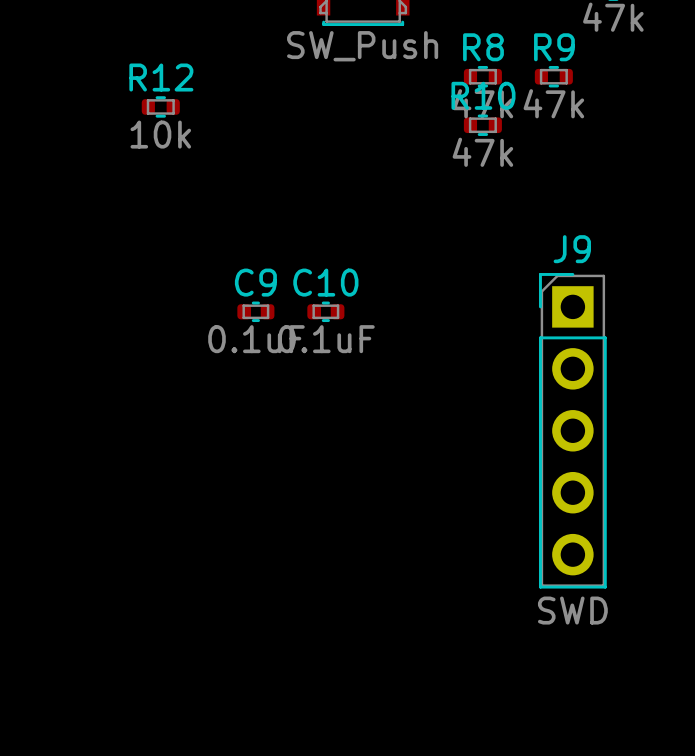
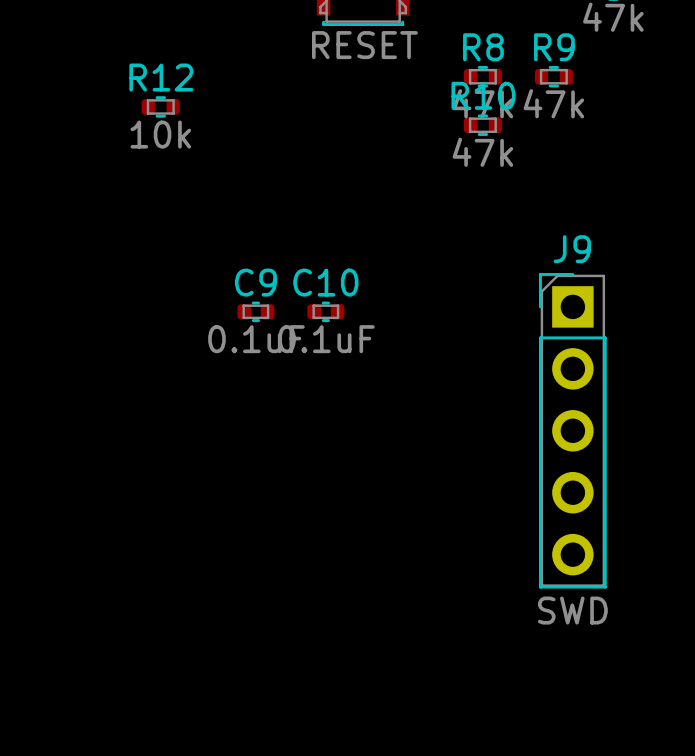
part value: SW_Push (362, 46) -> RESET (364, 45)

